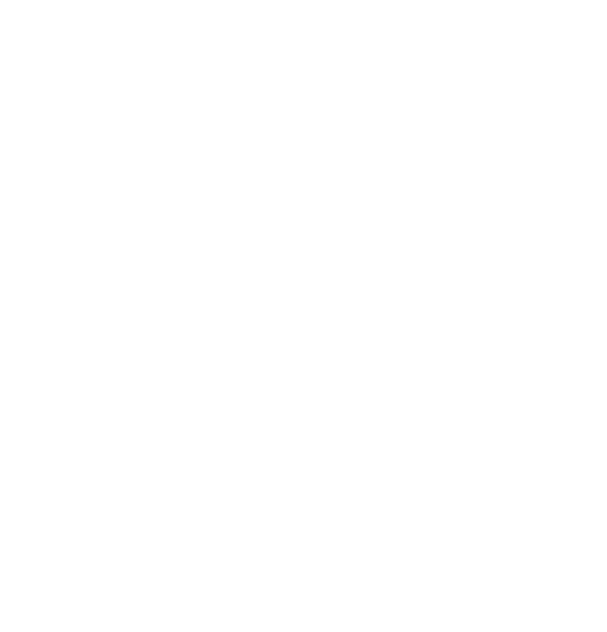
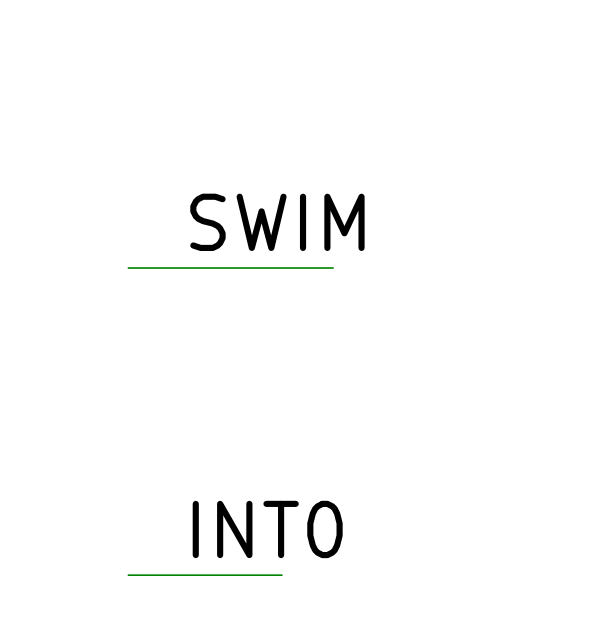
label: none -> SWIM (277, 222)
wire: none -> (128, 268) (333, 268)
label: none -> INT0 (267, 529)
wire: none -> (128, 575) (281, 575)

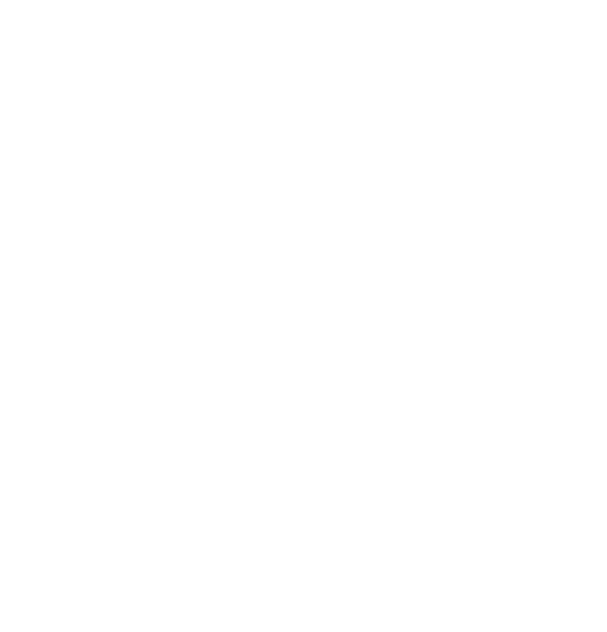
label: SWIM (277, 222) -> none
wire: (128, 268) (333, 268) -> none
label: INT0 (267, 529) -> none
wire: (128, 575) (281, 575) -> none

